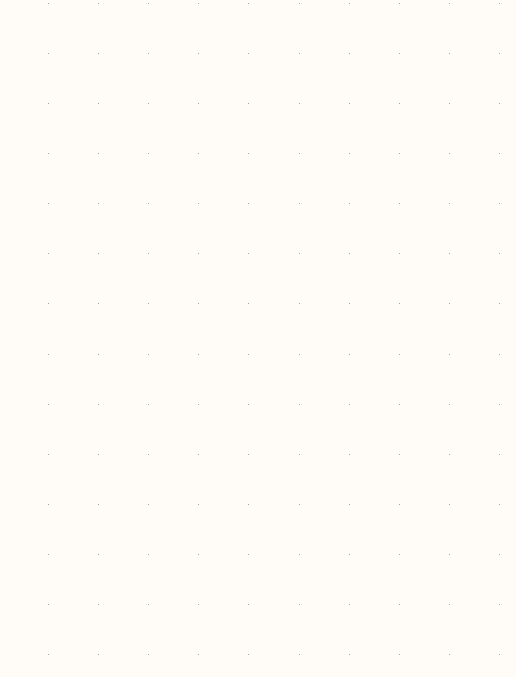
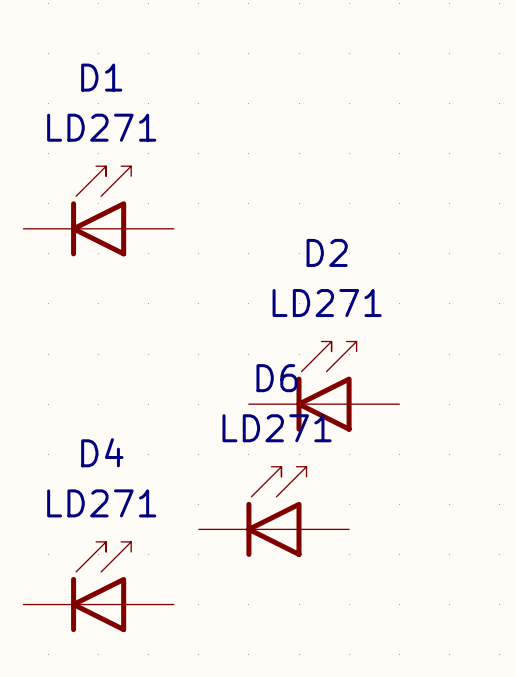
D1: none -> LD271 (98, 211)
D2: none -> LD271 (324, 386)
D6: none -> LD271 (273, 511)
D4: none -> LD271 (98, 586)

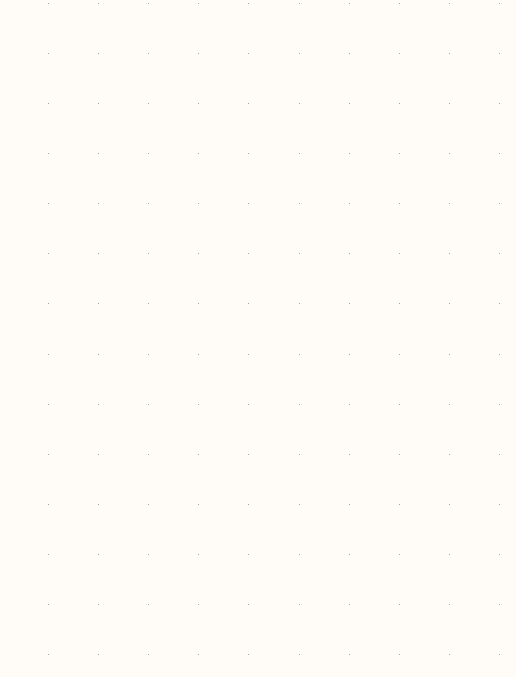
D1: LD271 (98, 211) -> none
D2: LD271 (324, 386) -> none
D6: LD271 (273, 511) -> none
D4: LD271 (98, 586) -> none

